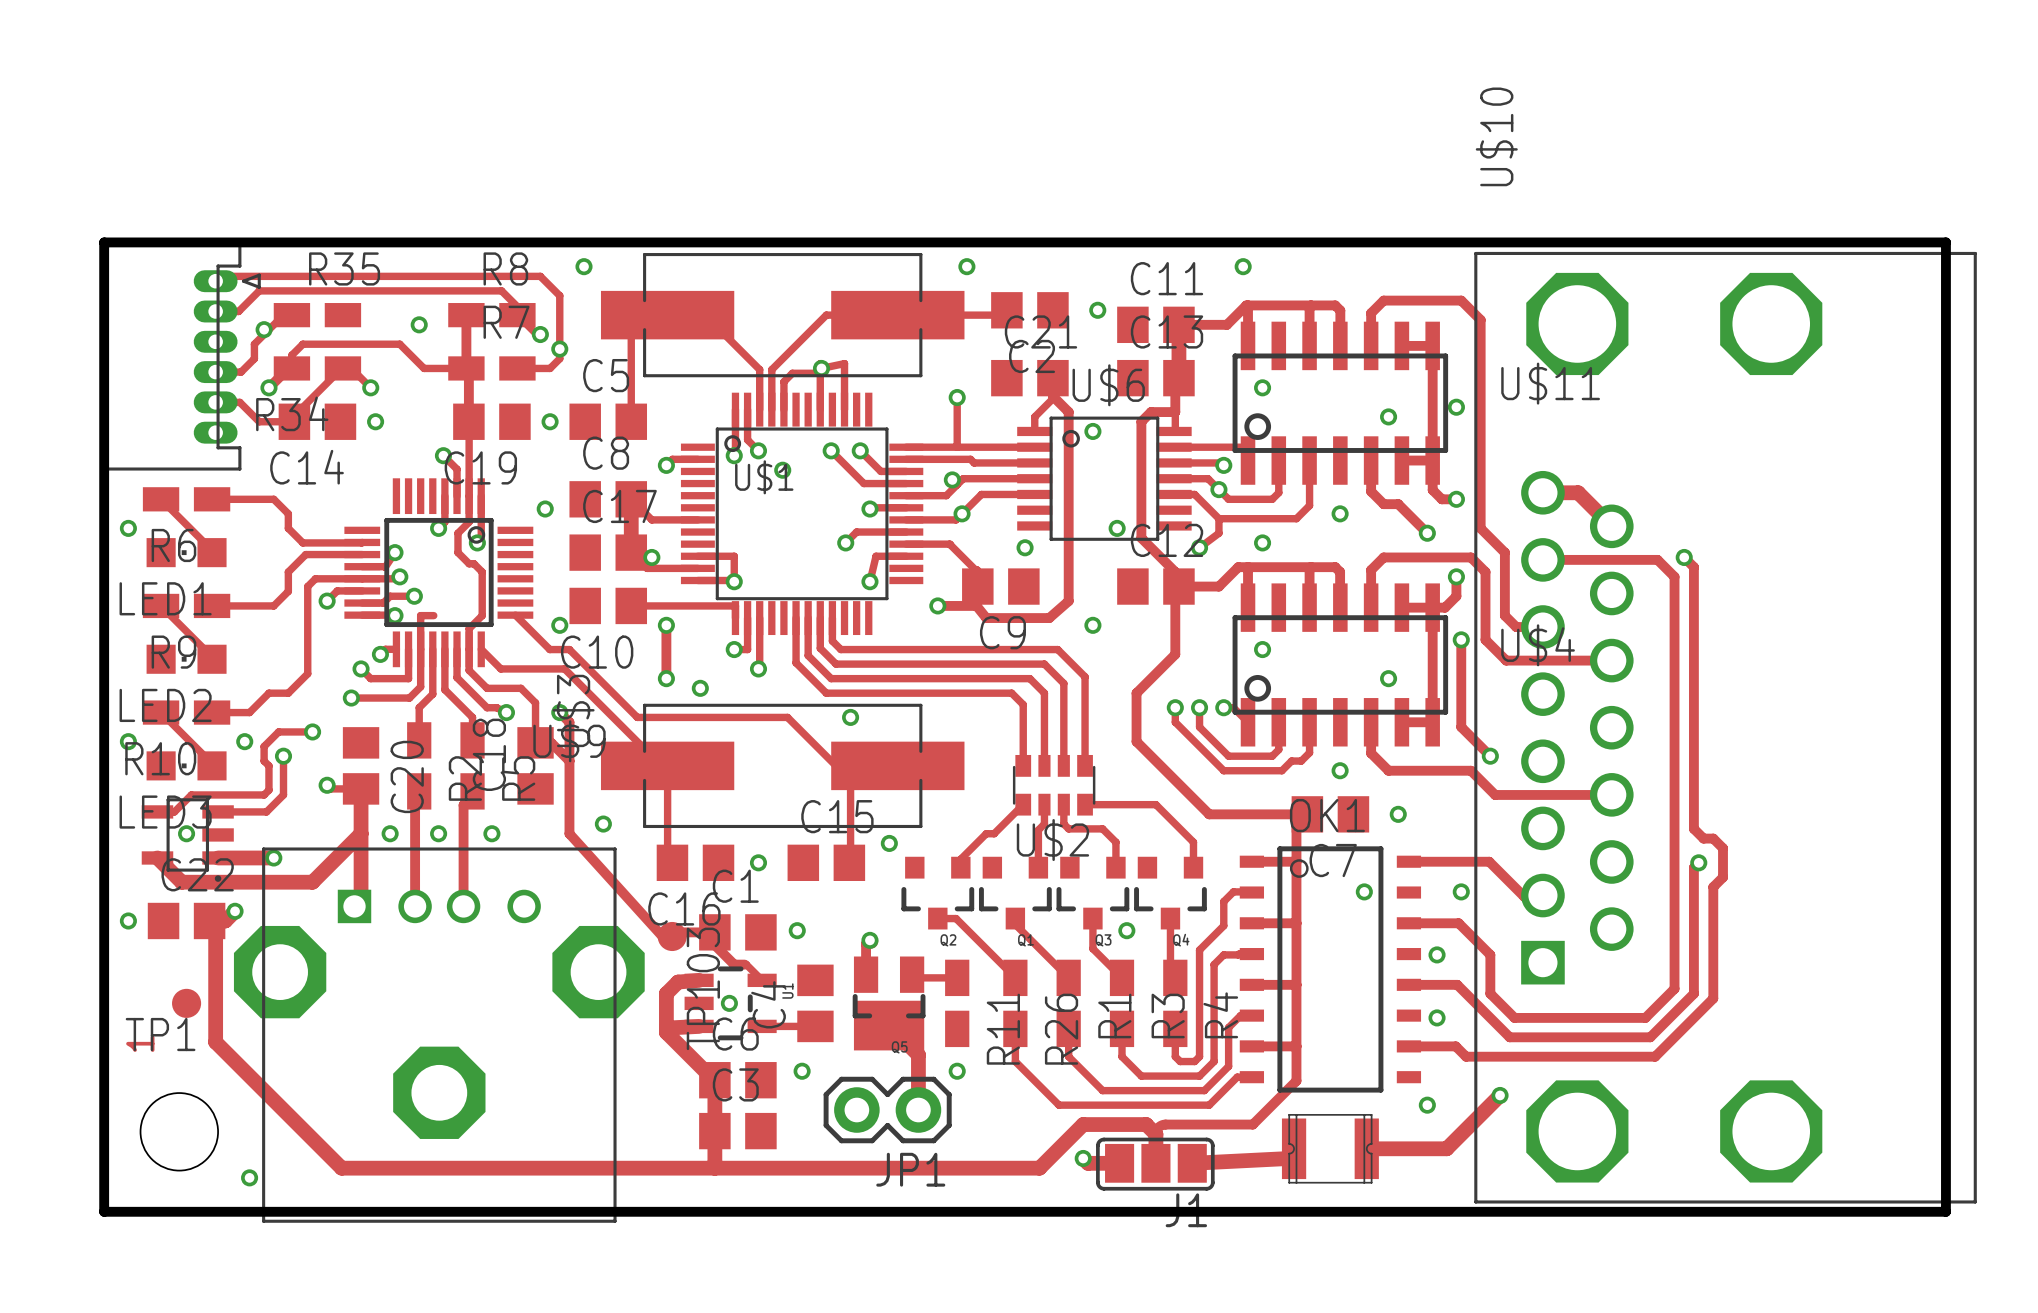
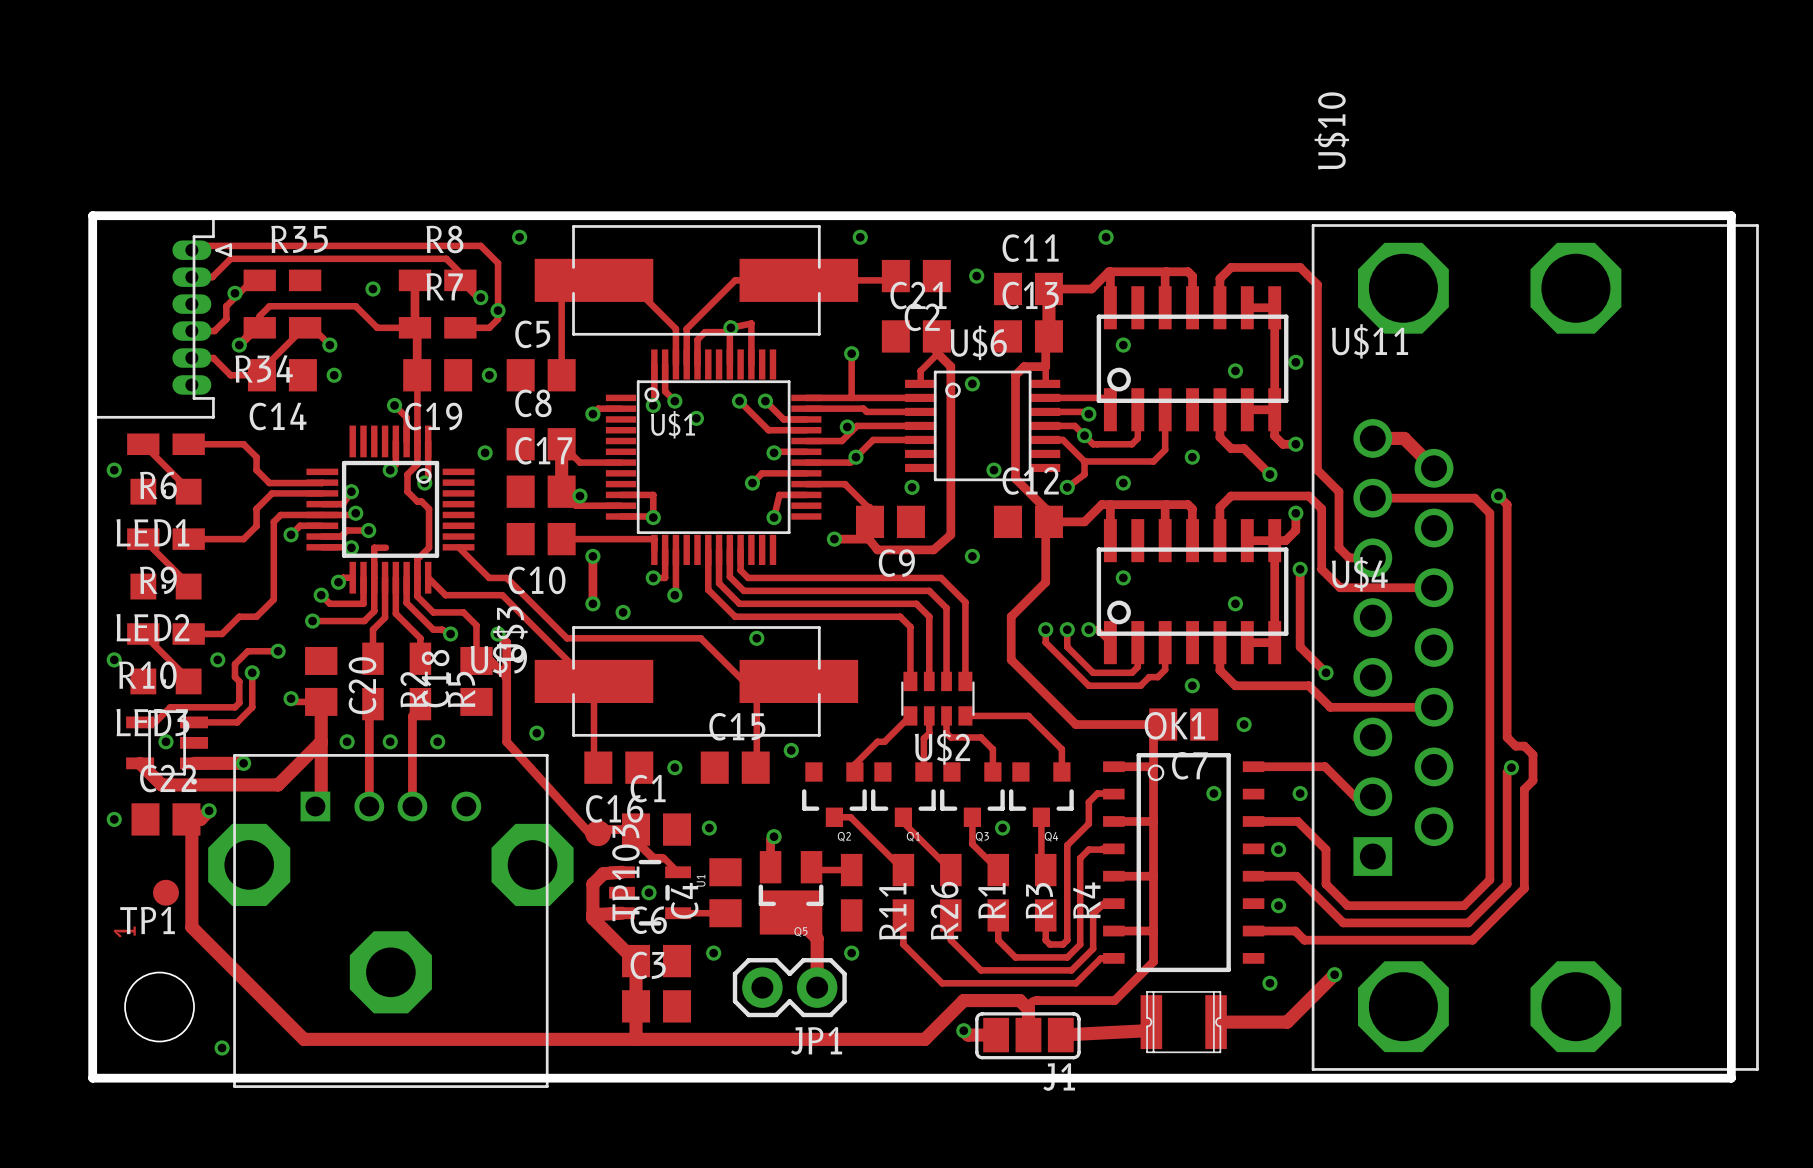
via: (559, 625) -> none

